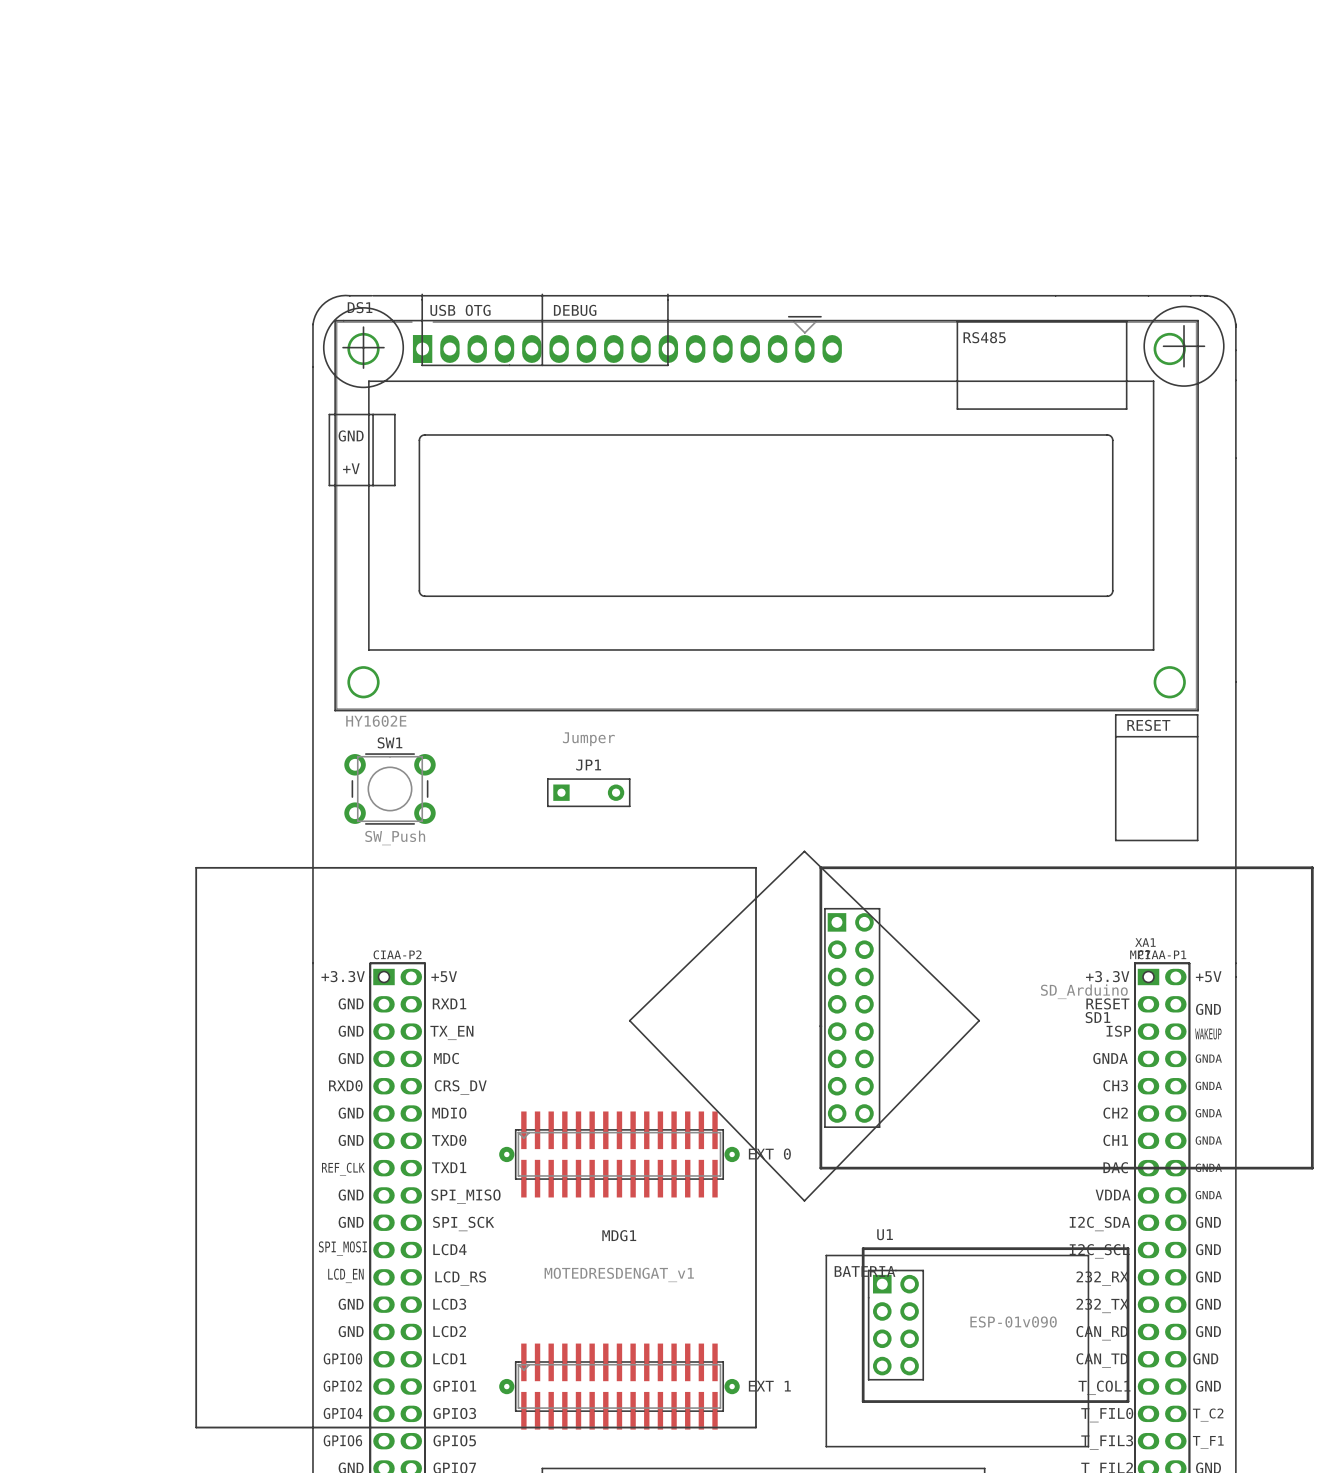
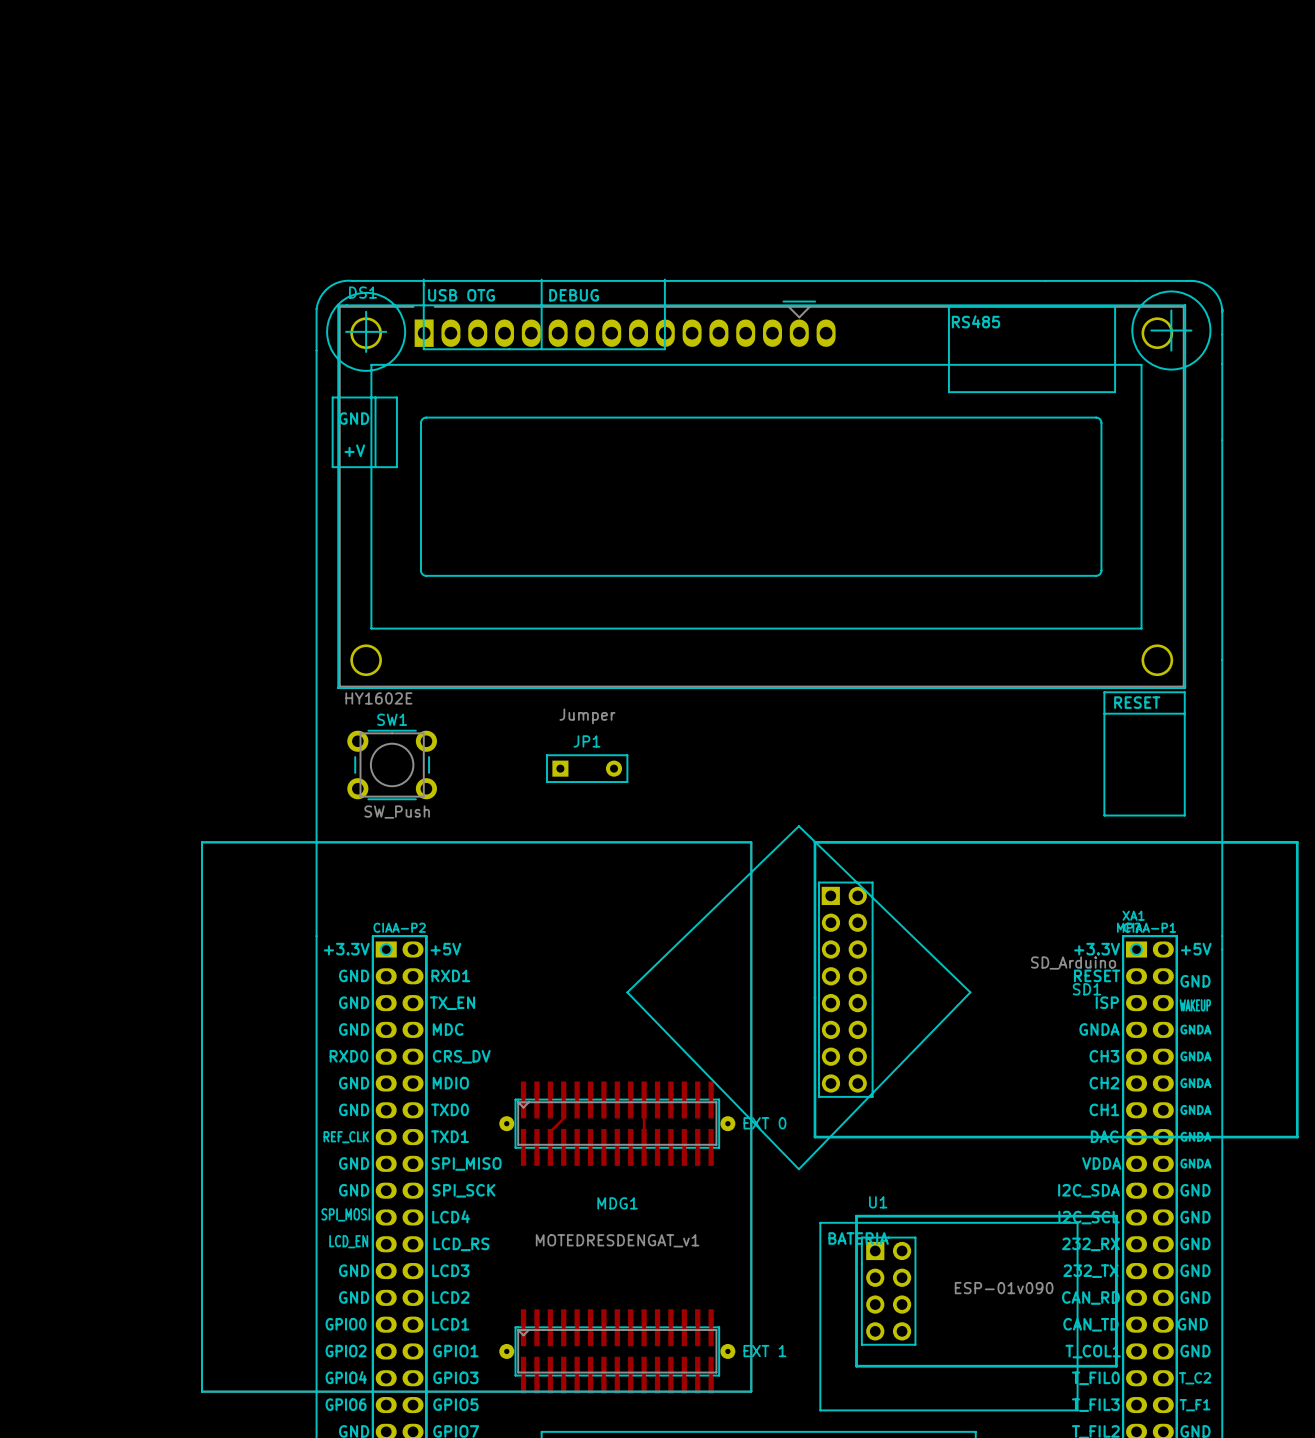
top track: none -> (563, 1118) (550, 1131) (550, 1142)
top track: none -> (644, 1118) (644, 1142)

